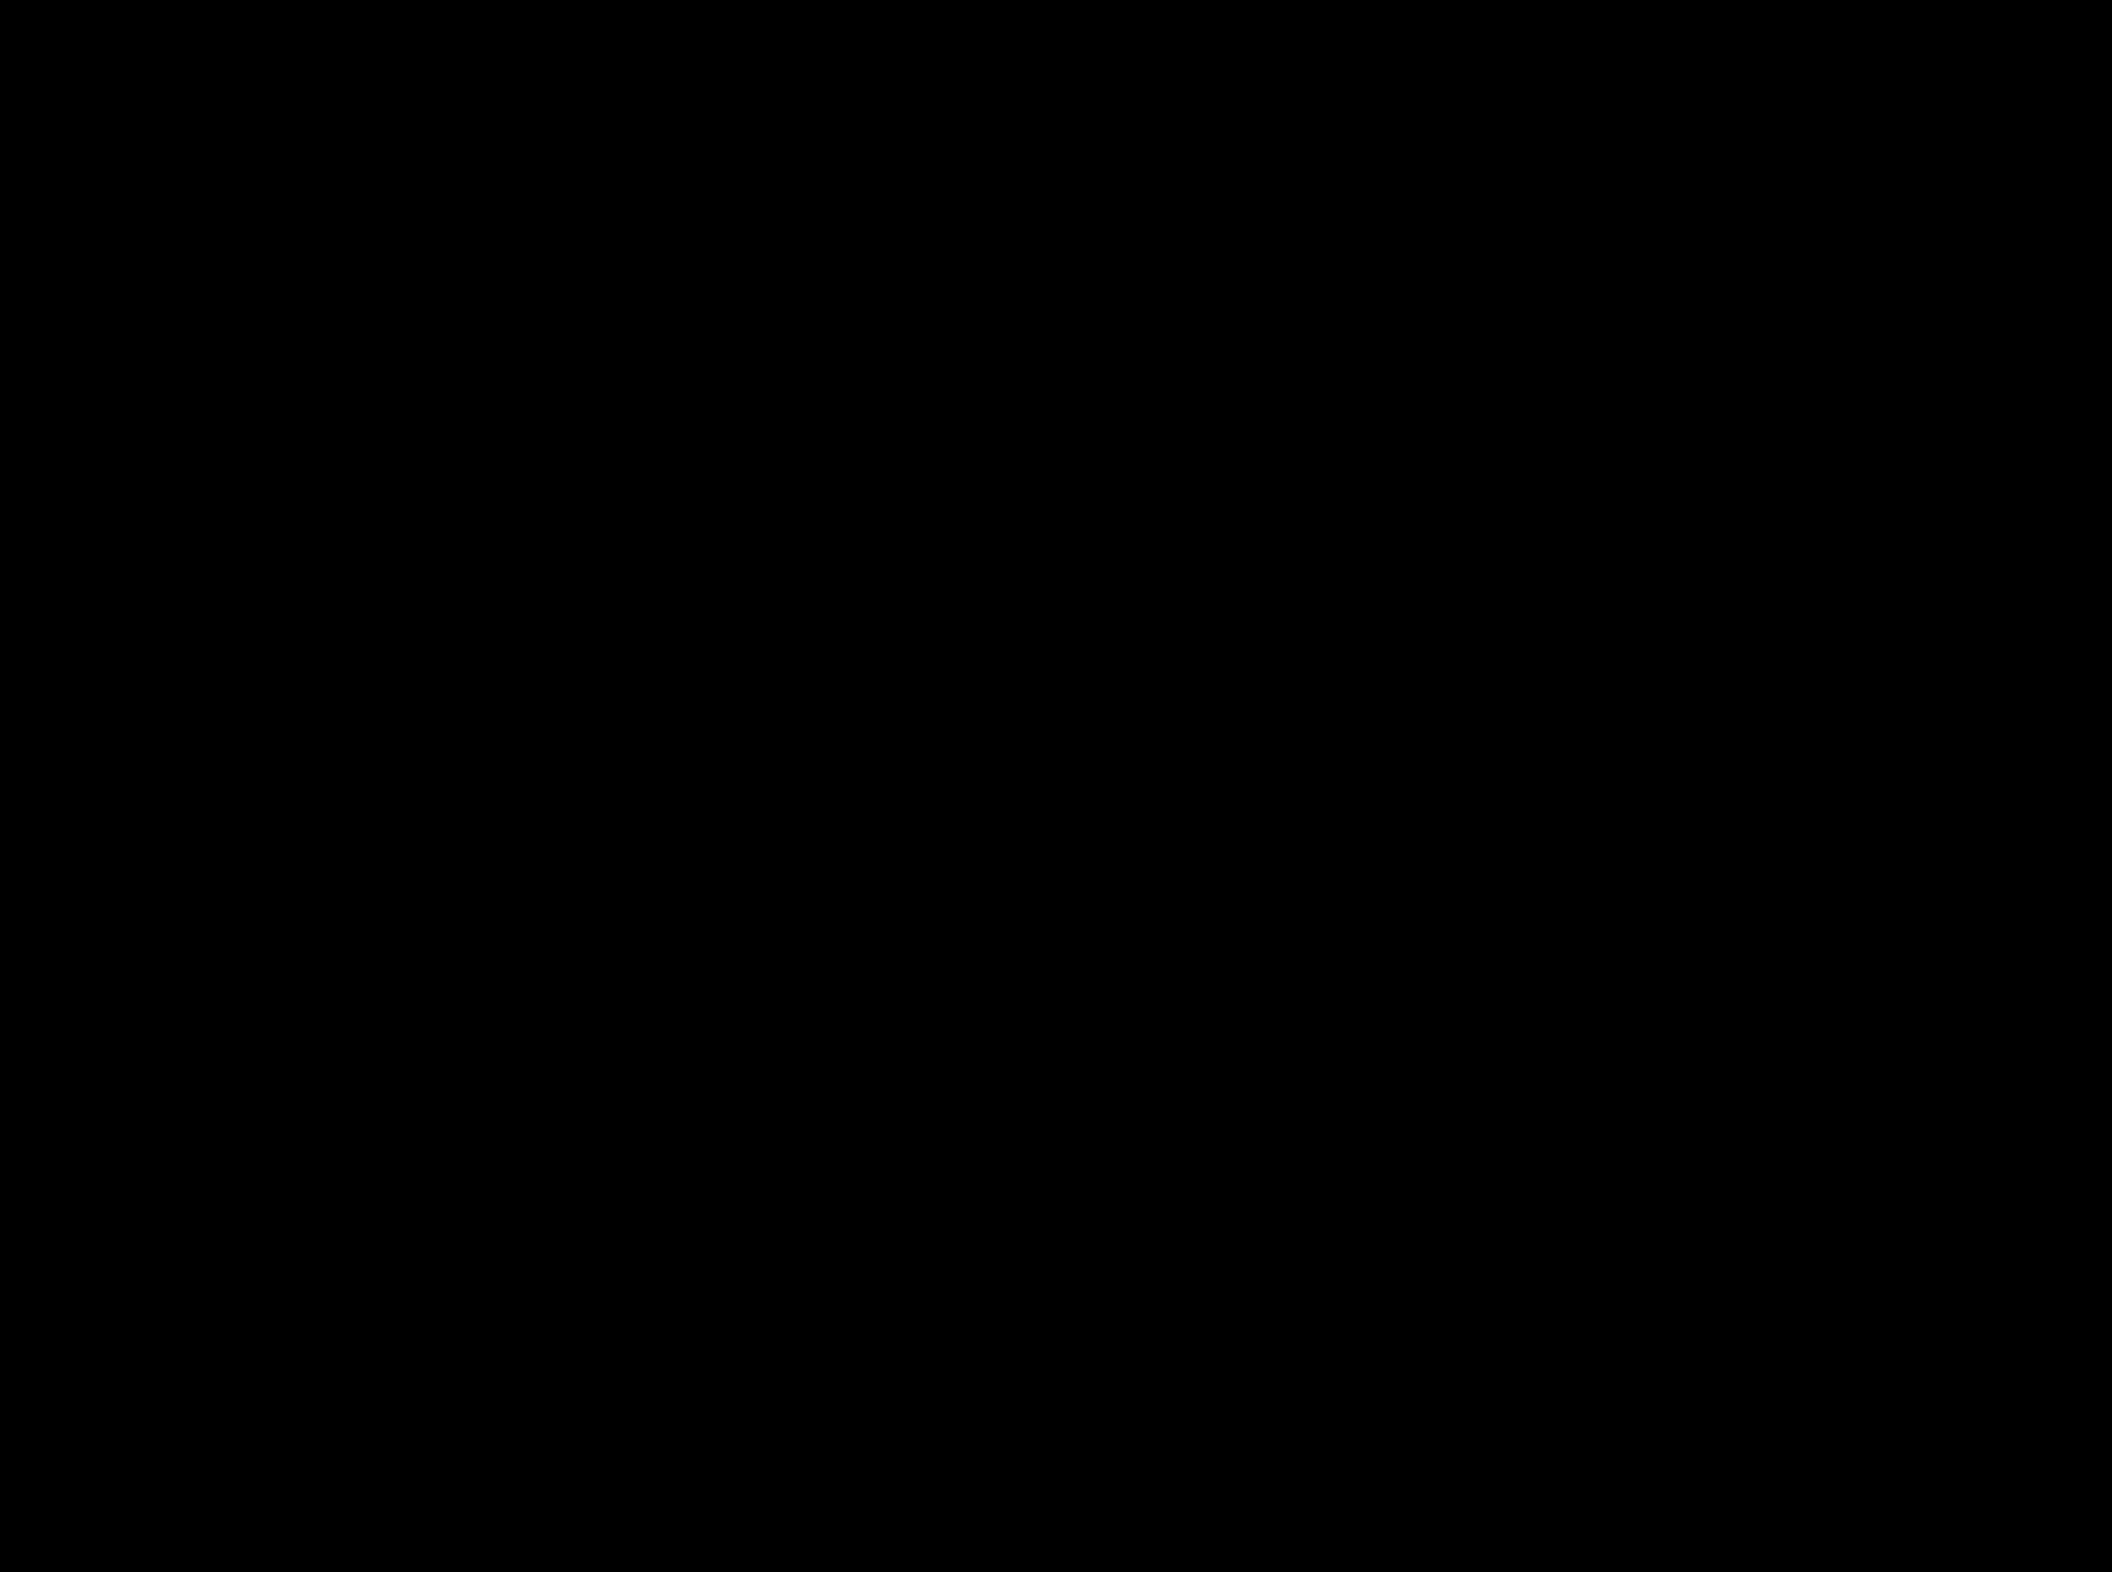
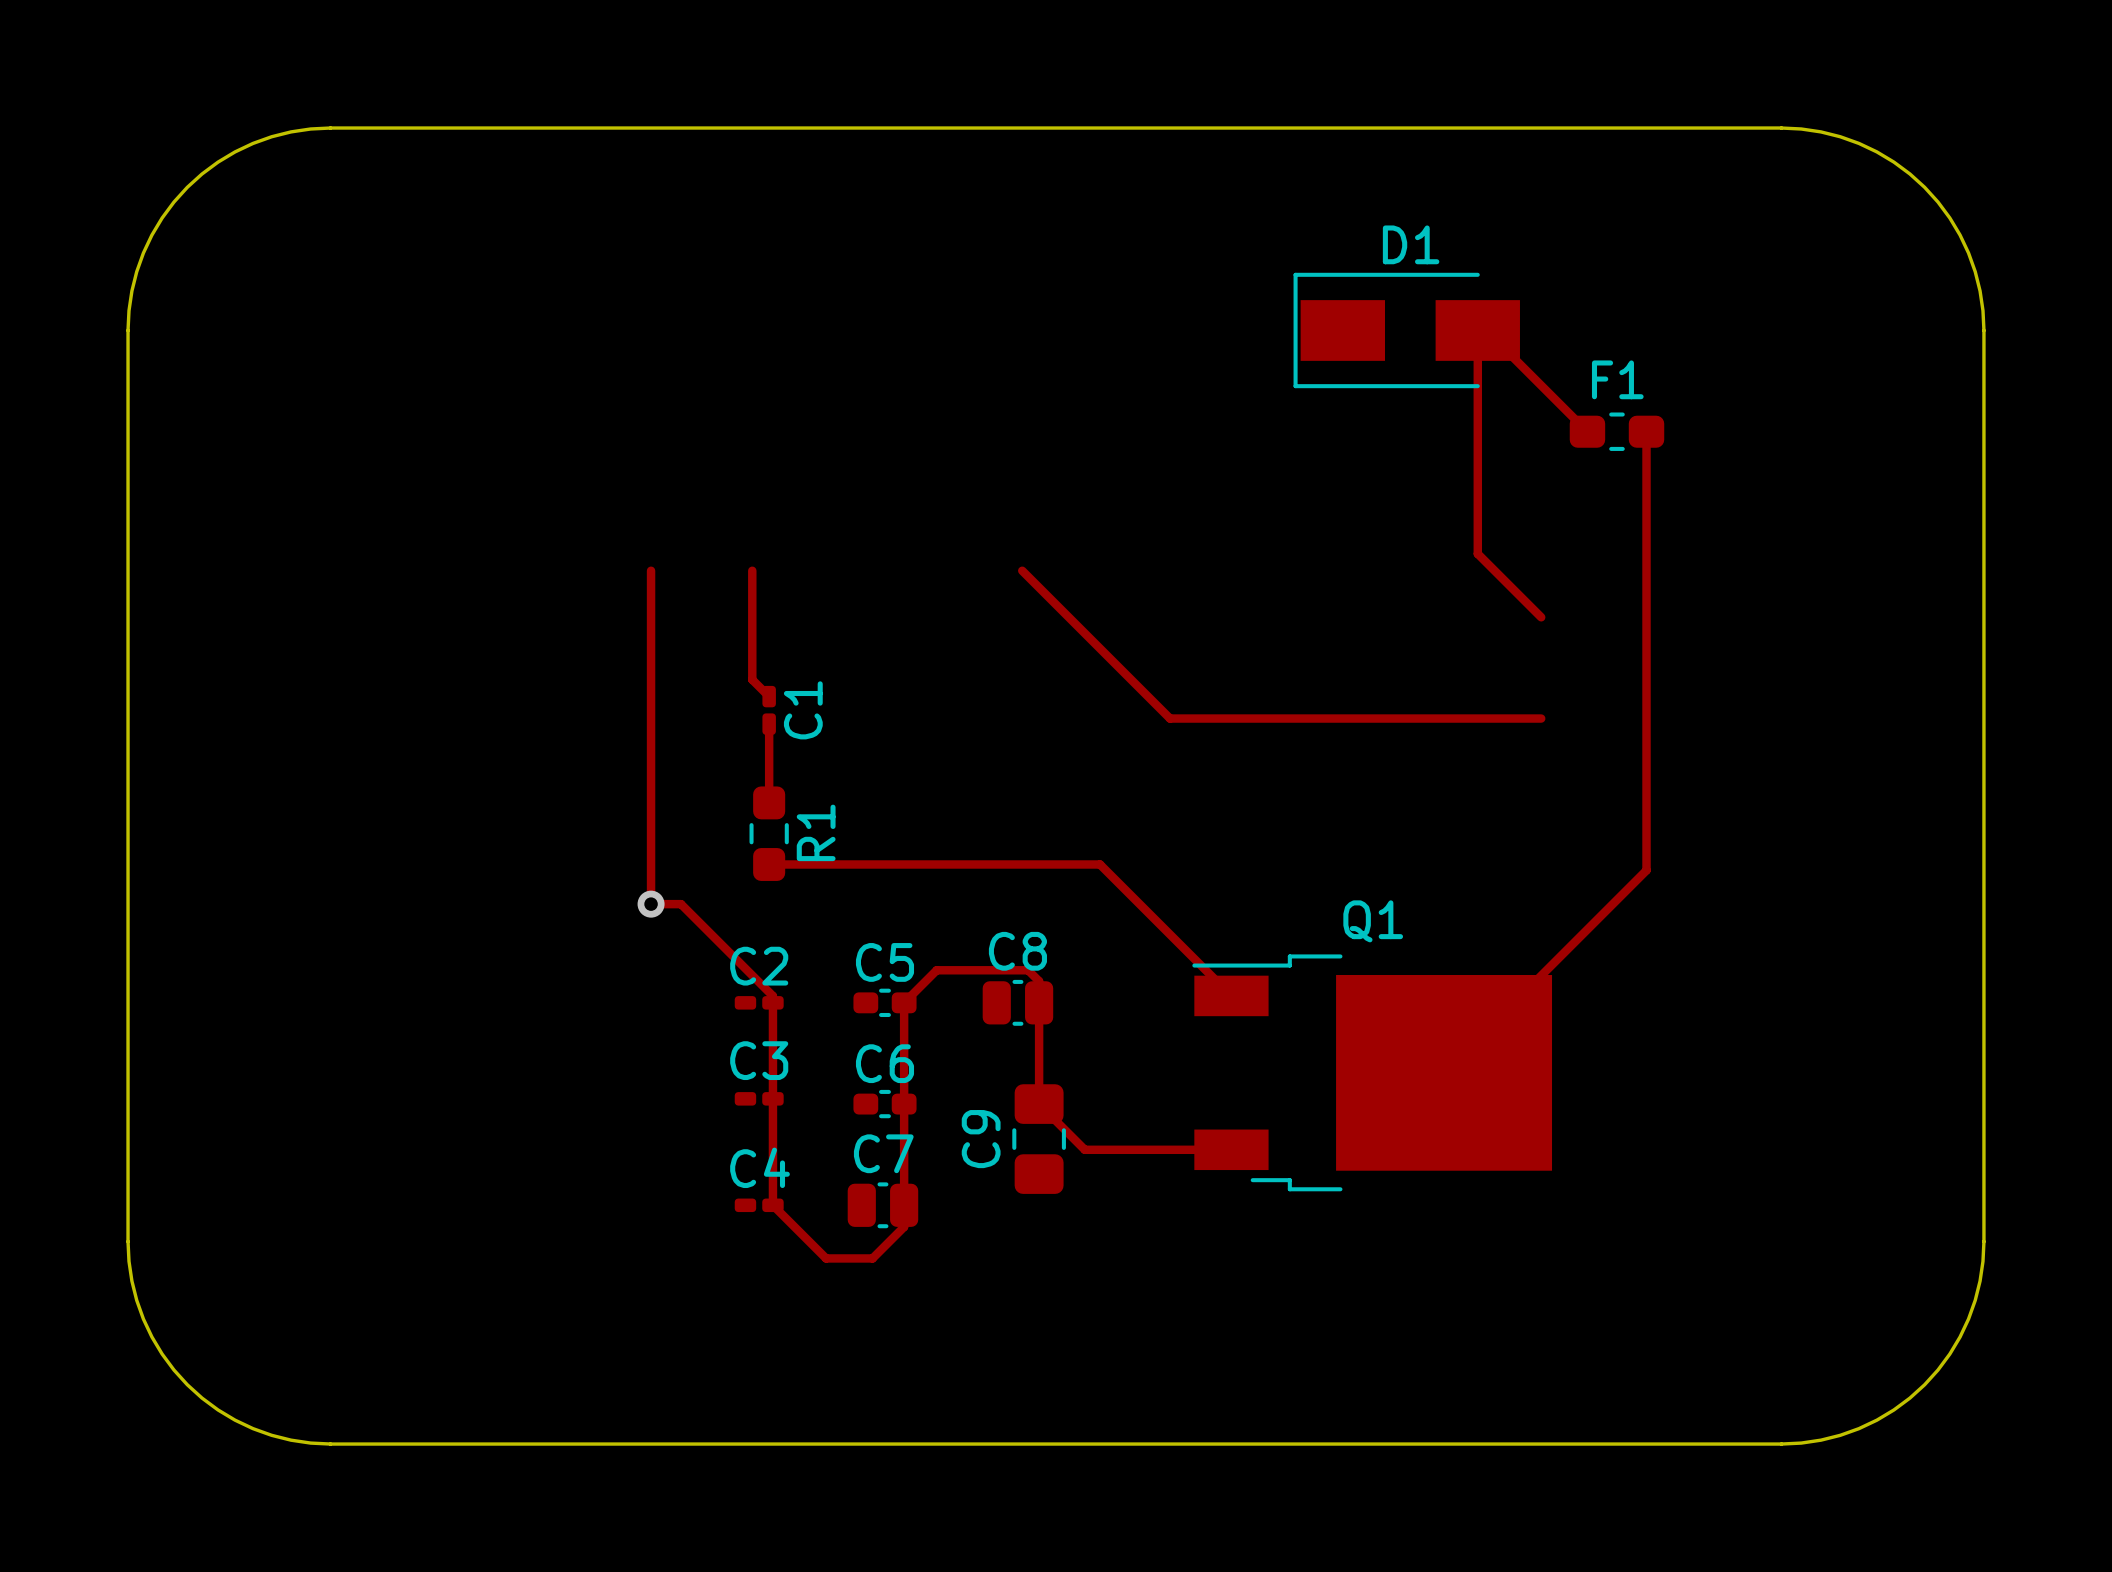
board edge: none -> (330, 128) (1781, 128) (1820, 131) (1858, 143) (1893, 162) (1909, 173) (1937, 202) (1960, 235) (1975, 271) (1980, 290) (1983, 330) (1983, 1241) (1982, 1261) (1975, 1300) (1960, 1337) (1937, 1370) (1909, 1398) (1876, 1420) (1840, 1435) (1820, 1440) (1781, 1444) (330, 1444) (290, 1440) (253, 1428) (218, 1409) (202, 1398) (173, 1370) (151, 1337) (136, 1300) (128, 1261) (128, 310) (131, 290) (143, 253) (162, 218) (187, 187) (218, 162) (253, 143) (290, 131) (330, 128)
D1: none -> (1406, 330)
top track: none -> (1587, 431) (1486, 330) (1477, 330) (1477, 553) (1541, 617)
F1: none -> (1616, 431)
top track: none -> (1646, 431) (1646, 870) (1444, 1072)
top track: none -> (651, 570) (651, 904) (681, 904) (772, 996) (772, 1205) (826, 1258) (872, 1258) (904, 1226) (904, 1002) (936, 970) (1028, 970) (1039, 981) (1039, 1104) (1084, 1149) (1231, 1149)
top track: none -> (752, 570) (752, 679) (769, 696)
top track: none -> (1022, 570) (1170, 718) (1541, 718)
C1: none -> (769, 710)
top track: none -> (769, 724) (769, 802)
R1: none -> (769, 833)
top track: none -> (769, 864) (1100, 864) (1231, 995)
via: none -> (651, 904)
C2: none -> (759, 1002)
C5: none -> (884, 1002)
C8: none -> (1017, 1002)
Q1: none -> (1372, 1072)
C3: none -> (759, 1098)
C6: none -> (884, 1104)
C9: none -> (1039, 1139)
C4: none -> (759, 1205)
C7: none -> (882, 1205)

